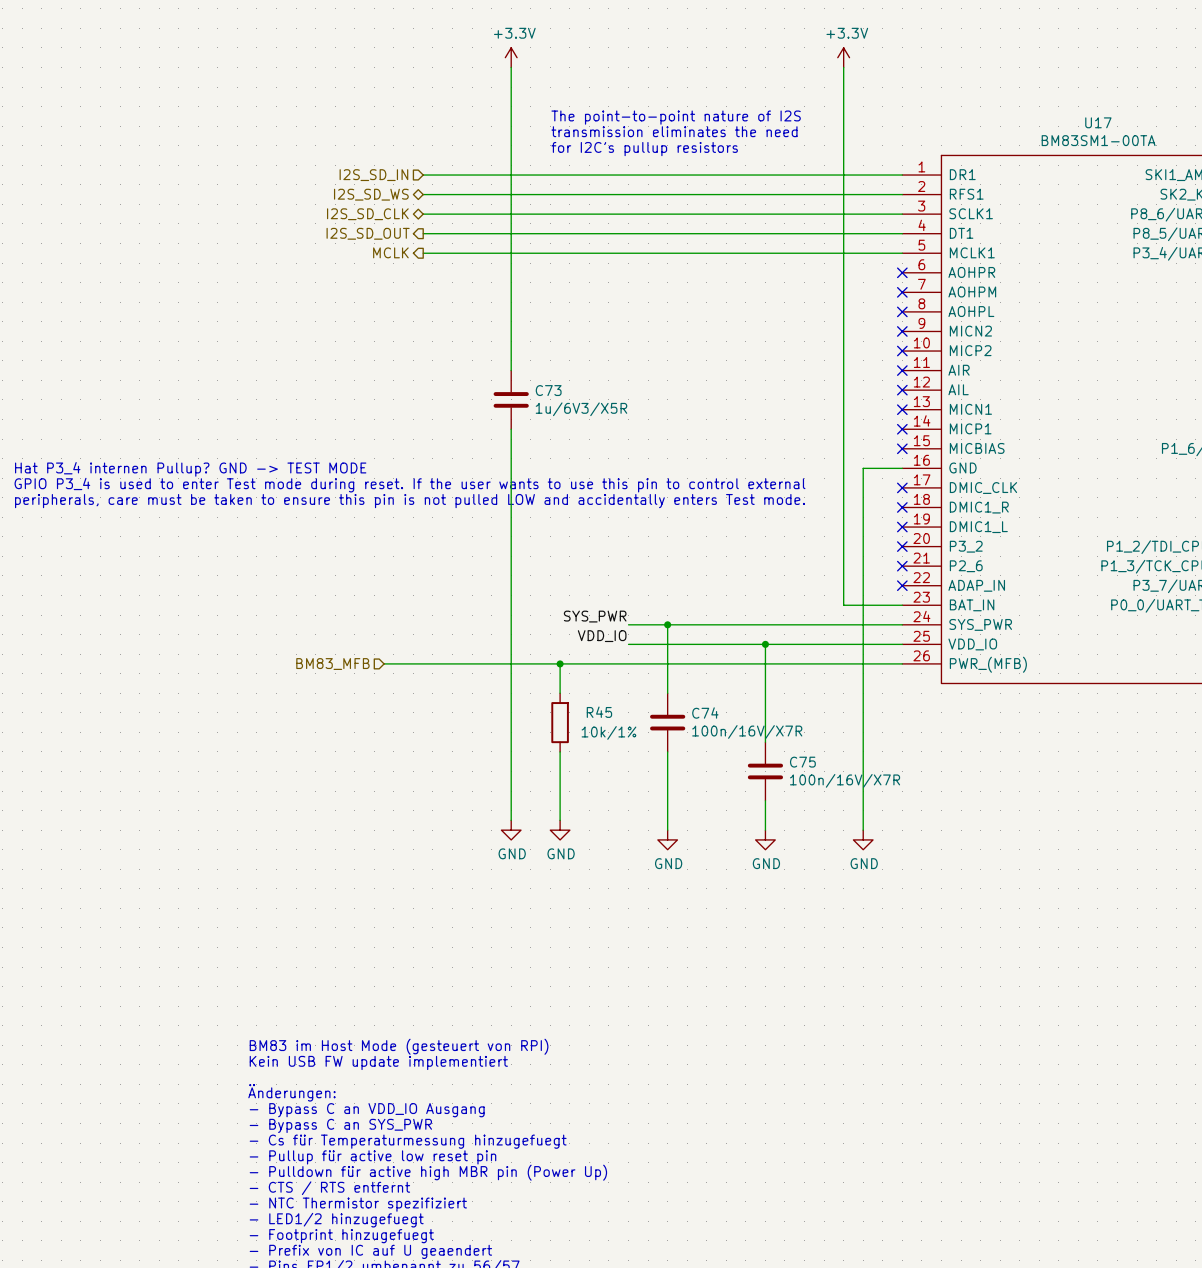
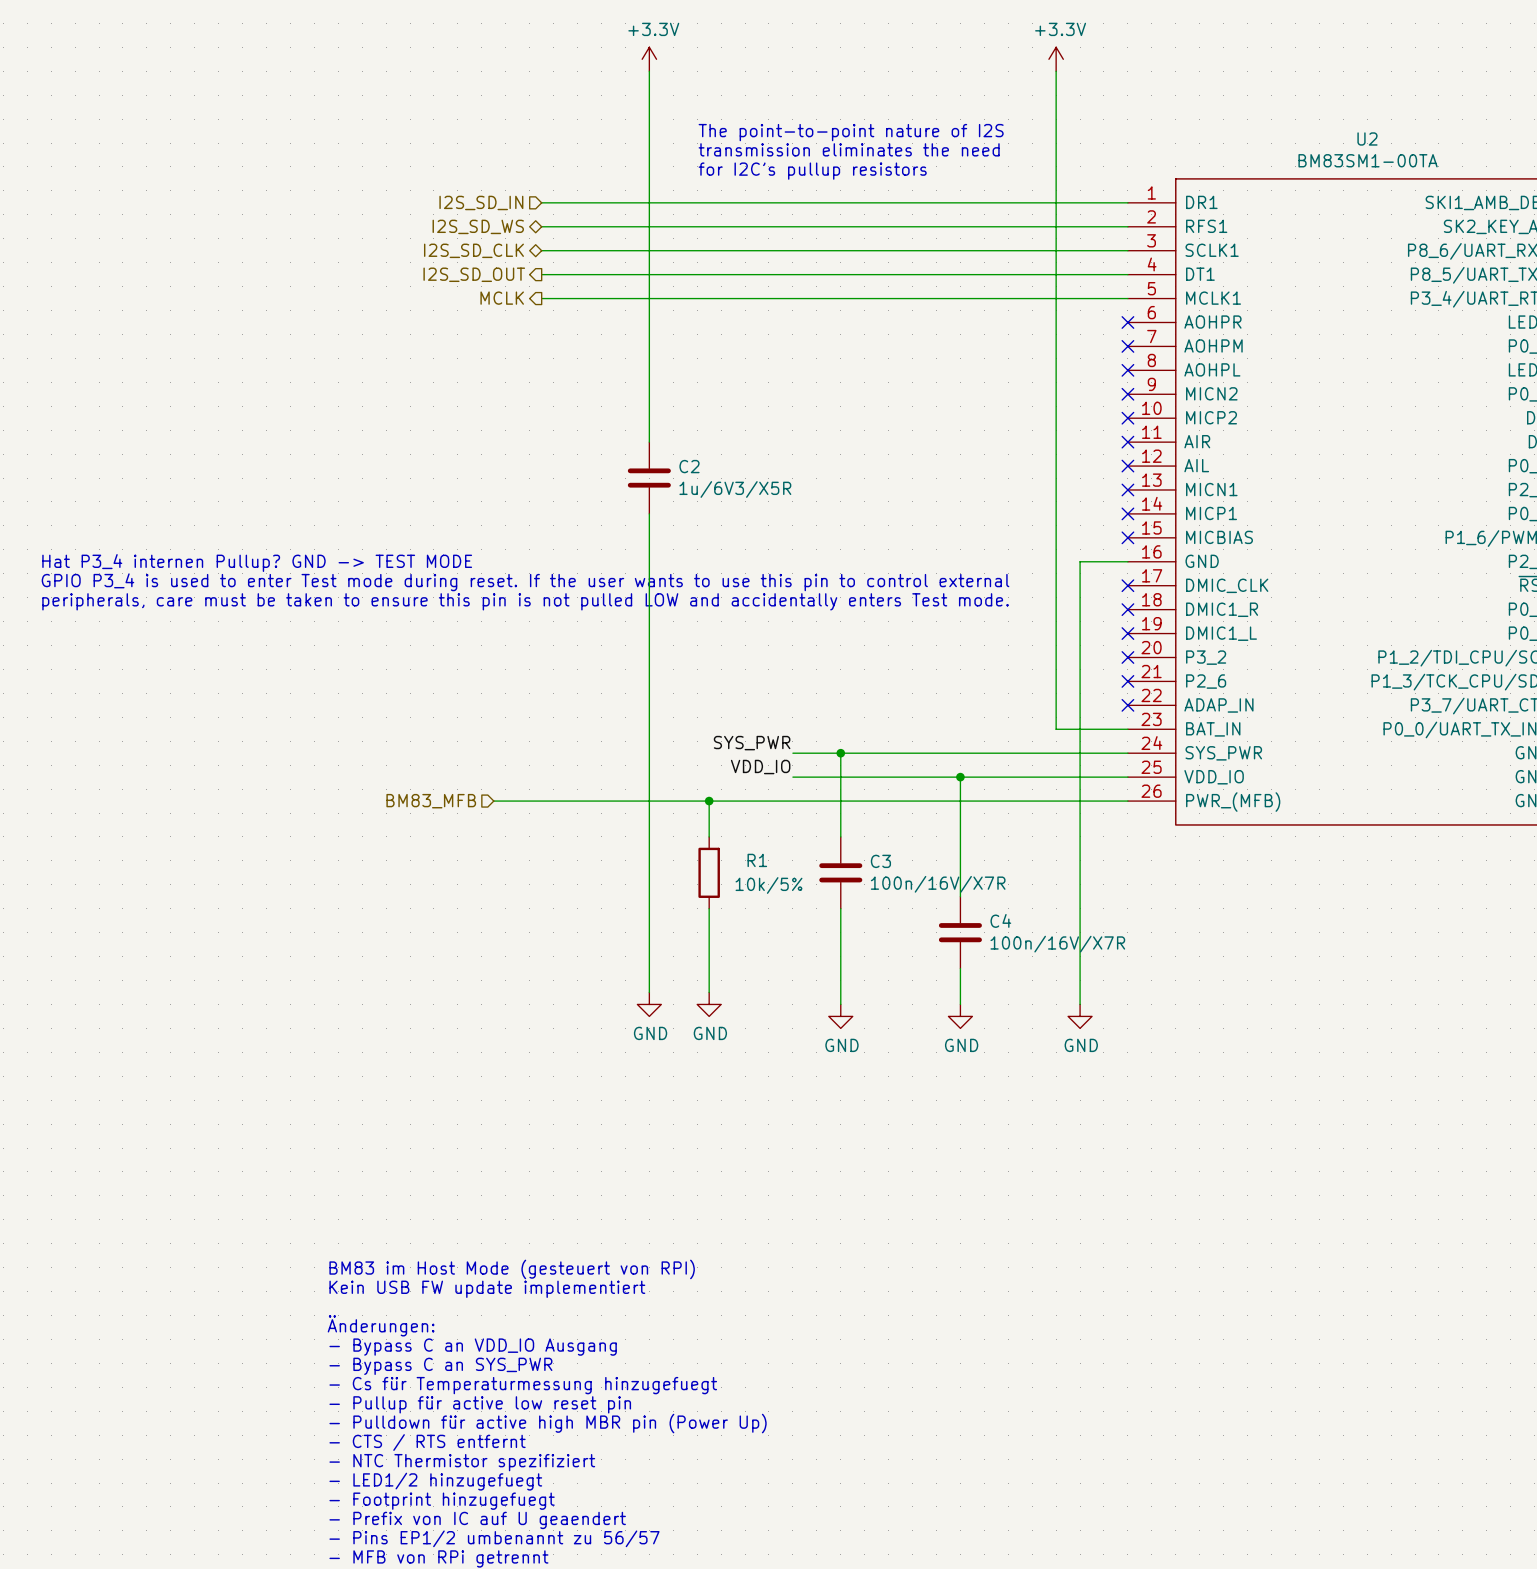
U17 name: U17 (1098, 122) -> U2 (1367, 138)
C73 name: C73 (548, 390) -> C2 (689, 466)
R45 name: R45 (599, 712) -> R1 (757, 860)
C74 name: C74 (705, 713) -> C3 (880, 861)
R45 value: 10k/1% (608, 732) -> 10k/5% (768, 885)
C75 name: C75 (802, 762) -> C4 (1000, 920)

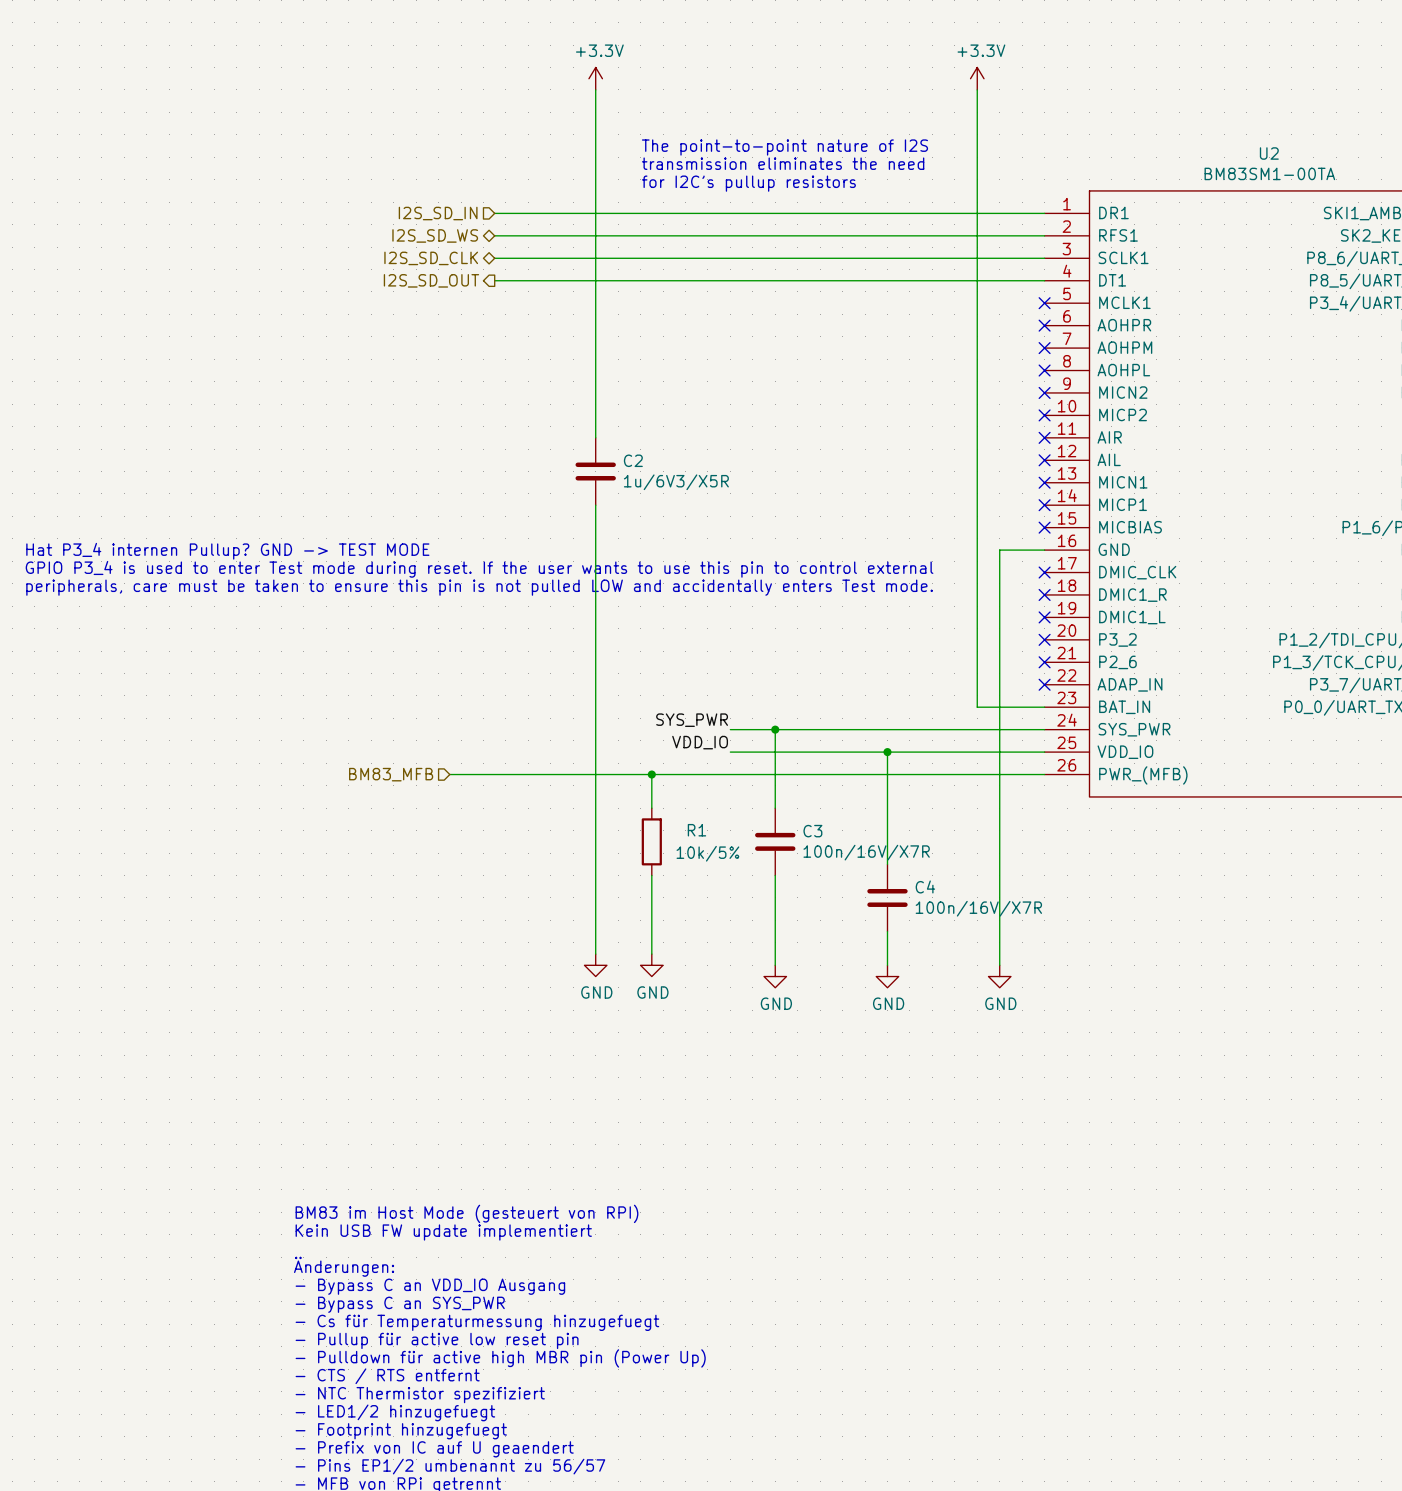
hierarchical label: MCLK (502, 298) -> none
wire: (541, 298) (1127, 298) -> none
no-connect mark: none -> (1044, 303)

